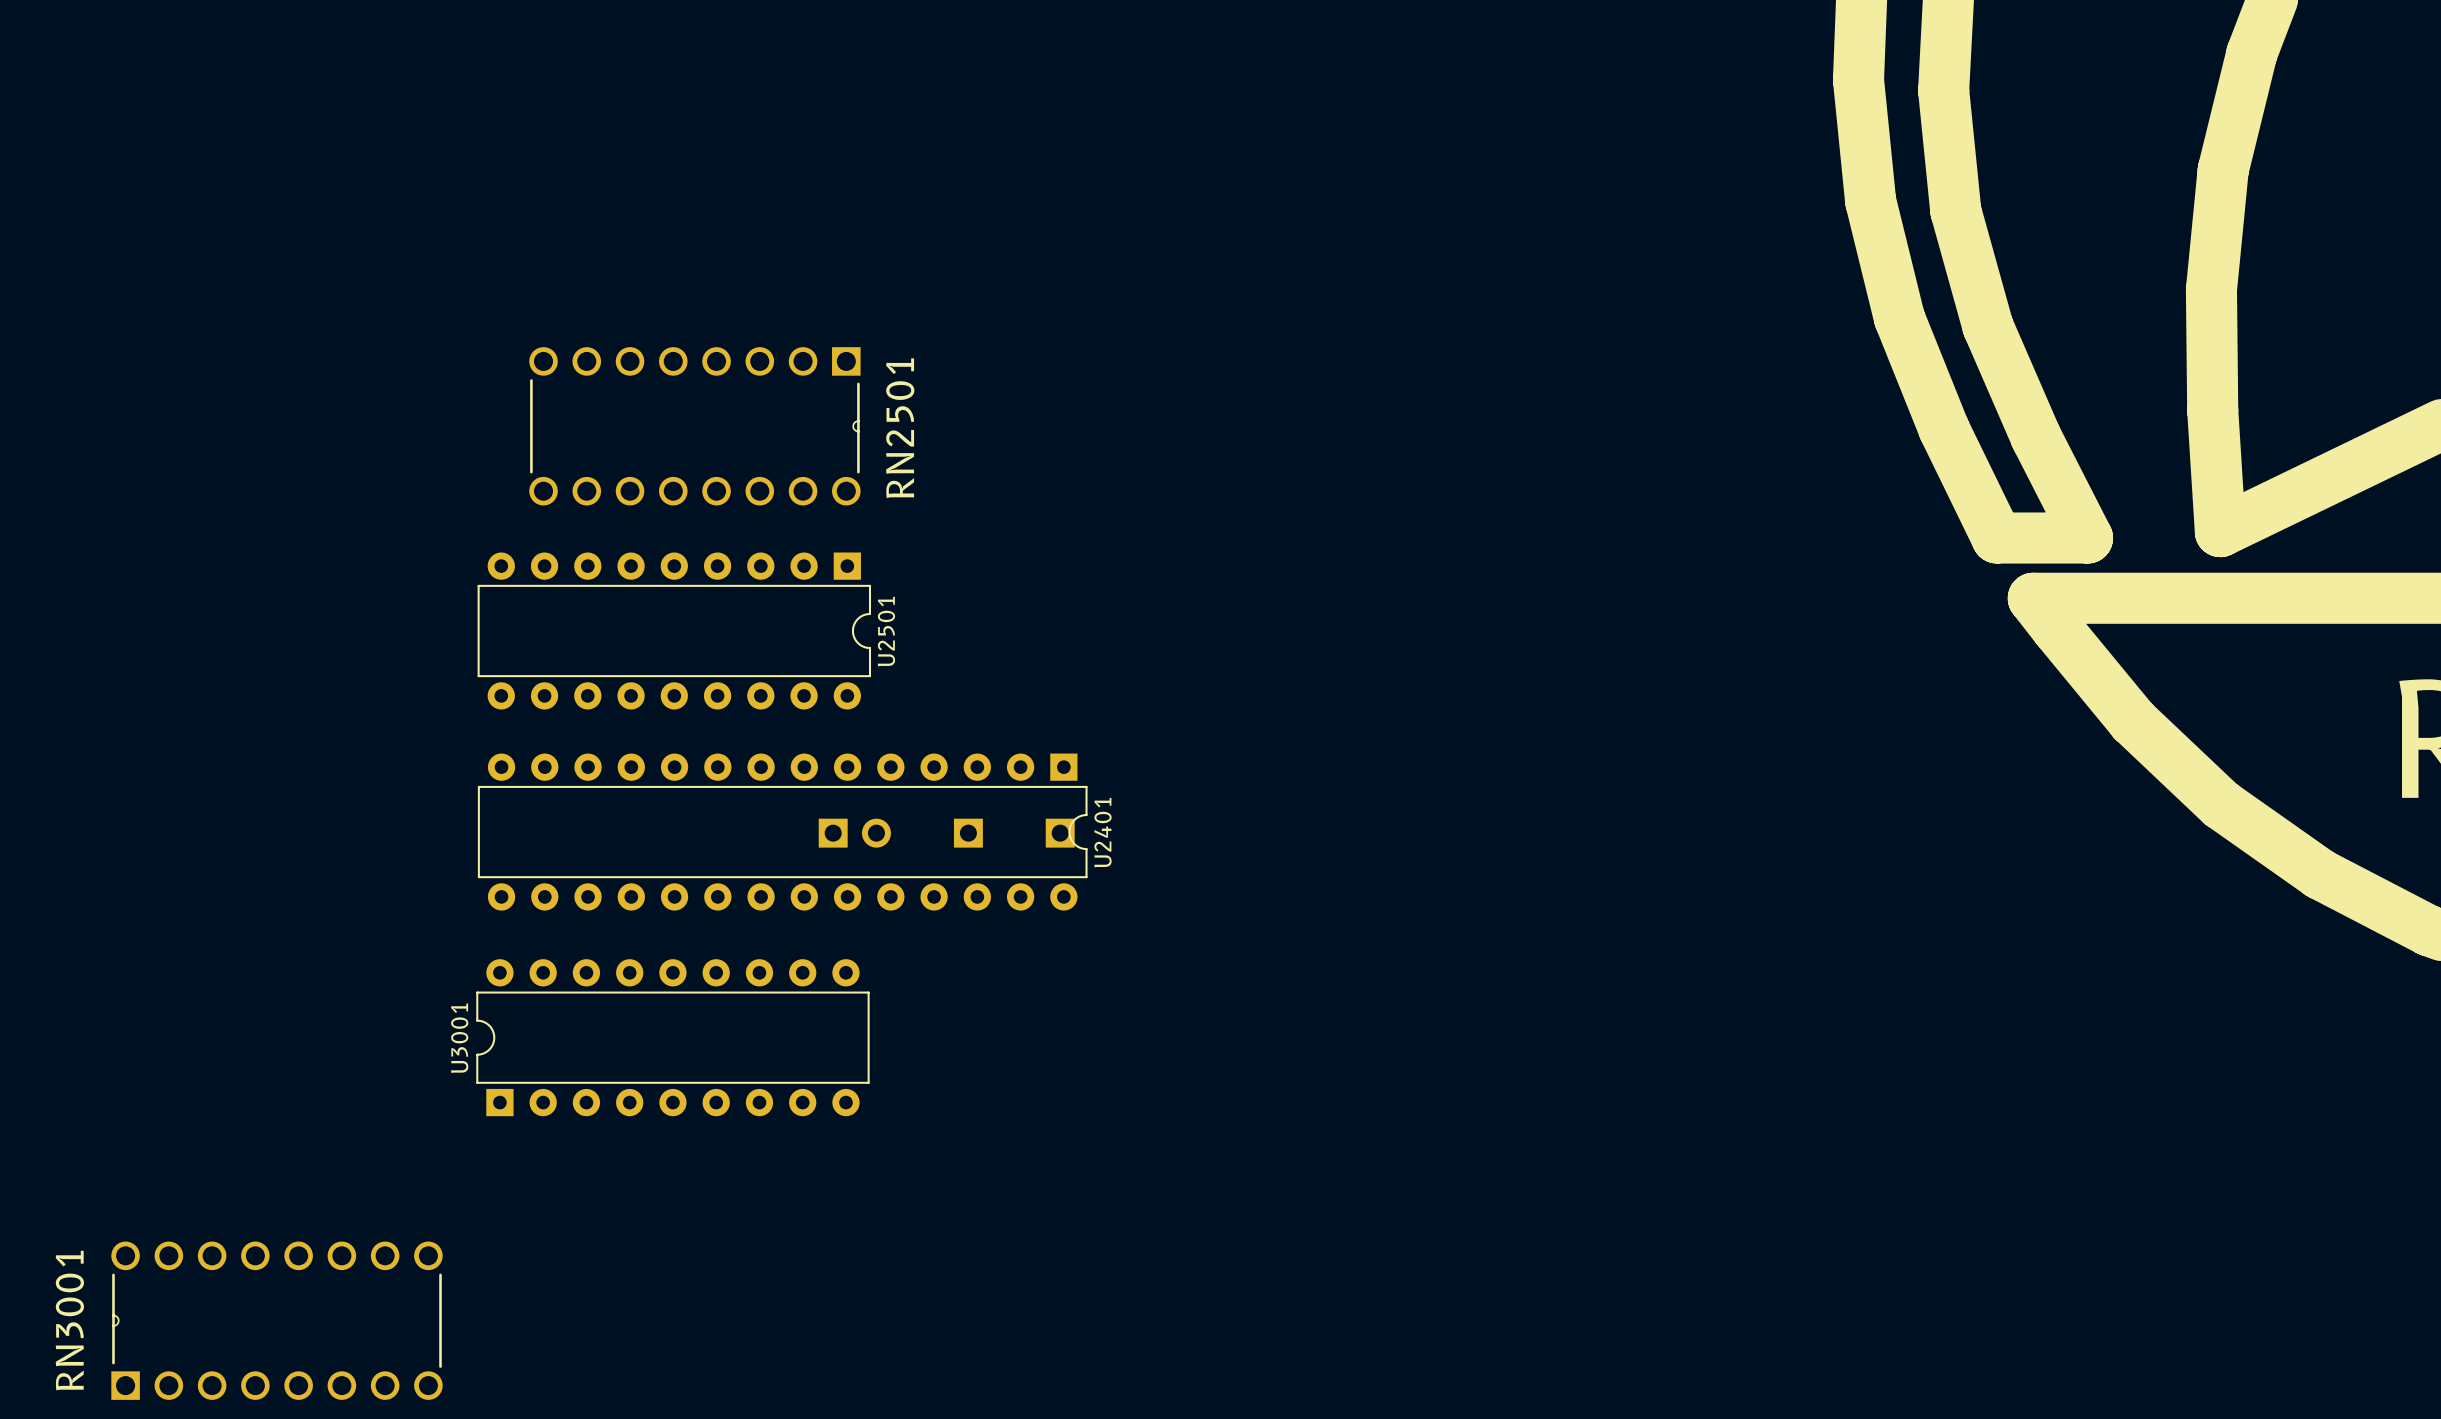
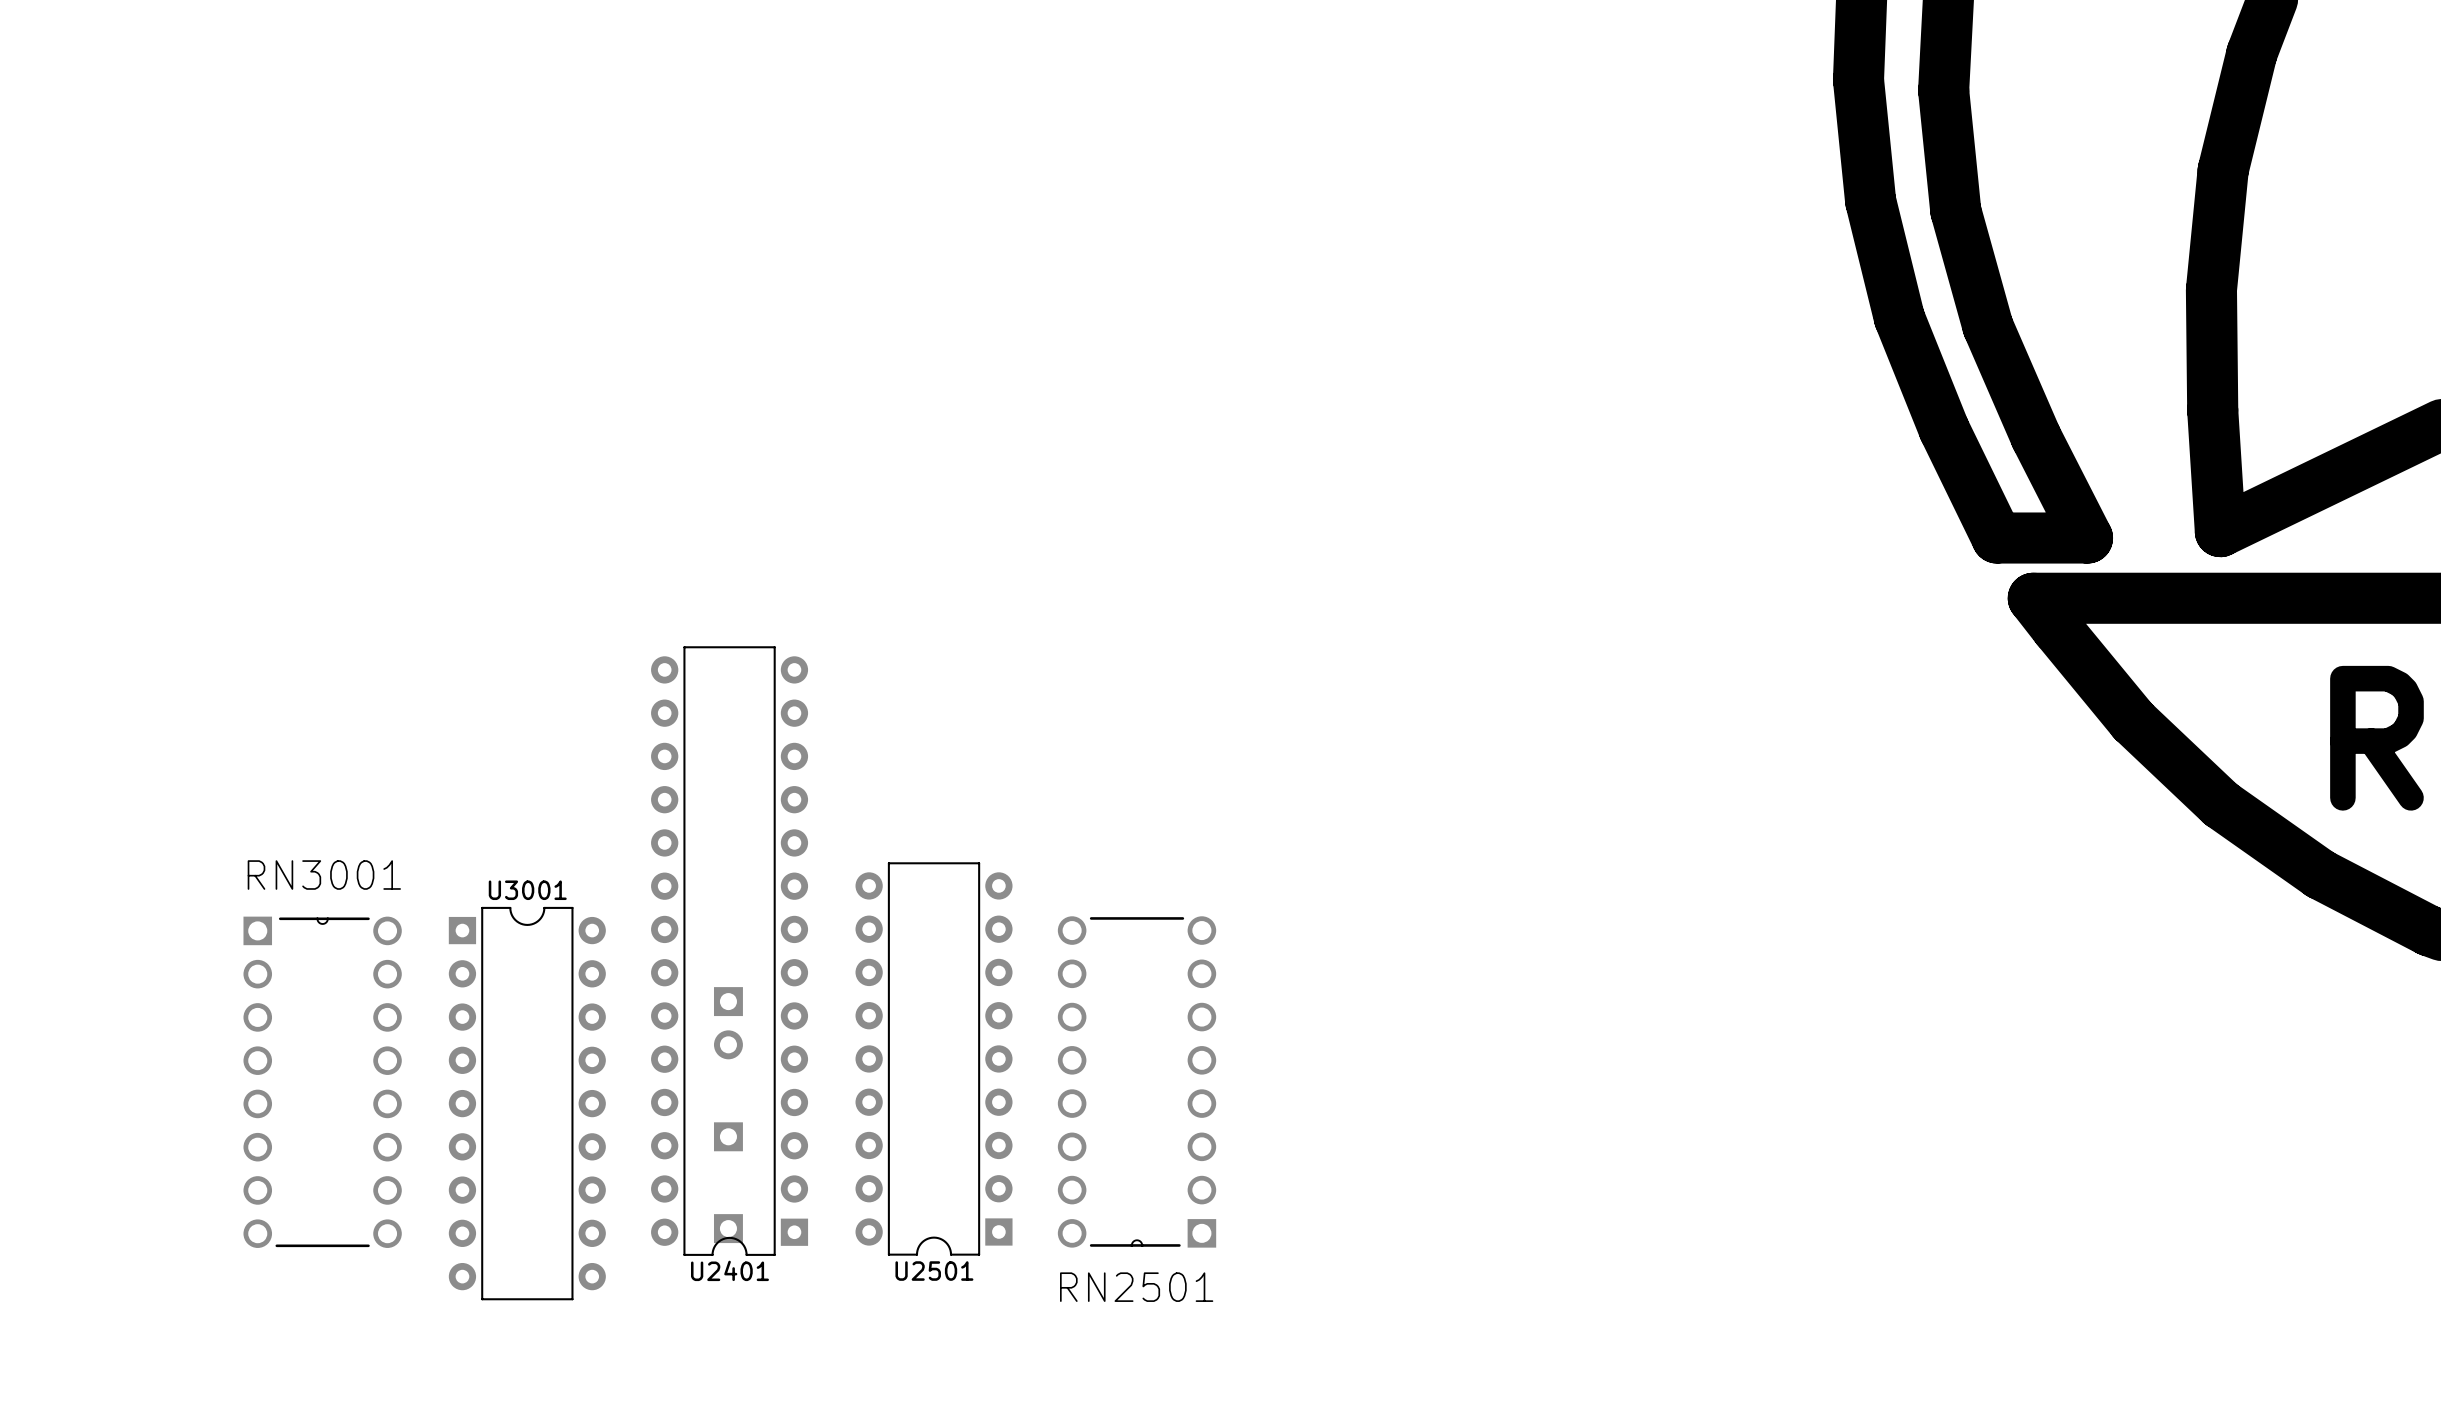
RN2501 rotation: 0° (694, 426) -> 90° clockwise (1137, 1081)
RN2501 position: (694, 426) -> (1137, 1081)
U2501 rotation: 0° (674, 631) -> 90° clockwise (934, 1058)
U2501 position: (674, 631) -> (934, 1058)
U2401 rotation: 0° (782, 832) -> 90° clockwise (729, 951)
part rotation: 0° (854, 833) -> 90° clockwise (728, 1023)
part position: (854, 833) -> (728, 1023)
part: (968, 833) -> none
part: (1060, 833) -> none
U3001 rotation: 0° (672, 1037) -> 90° clockwise (527, 1103)
part: none -> (728, 1136)
part: none -> (728, 1228)
RN3001 rotation: 0° (277, 1320) -> 90° clockwise (322, 1082)
RN3001 position: (277, 1320) -> (322, 1082)

